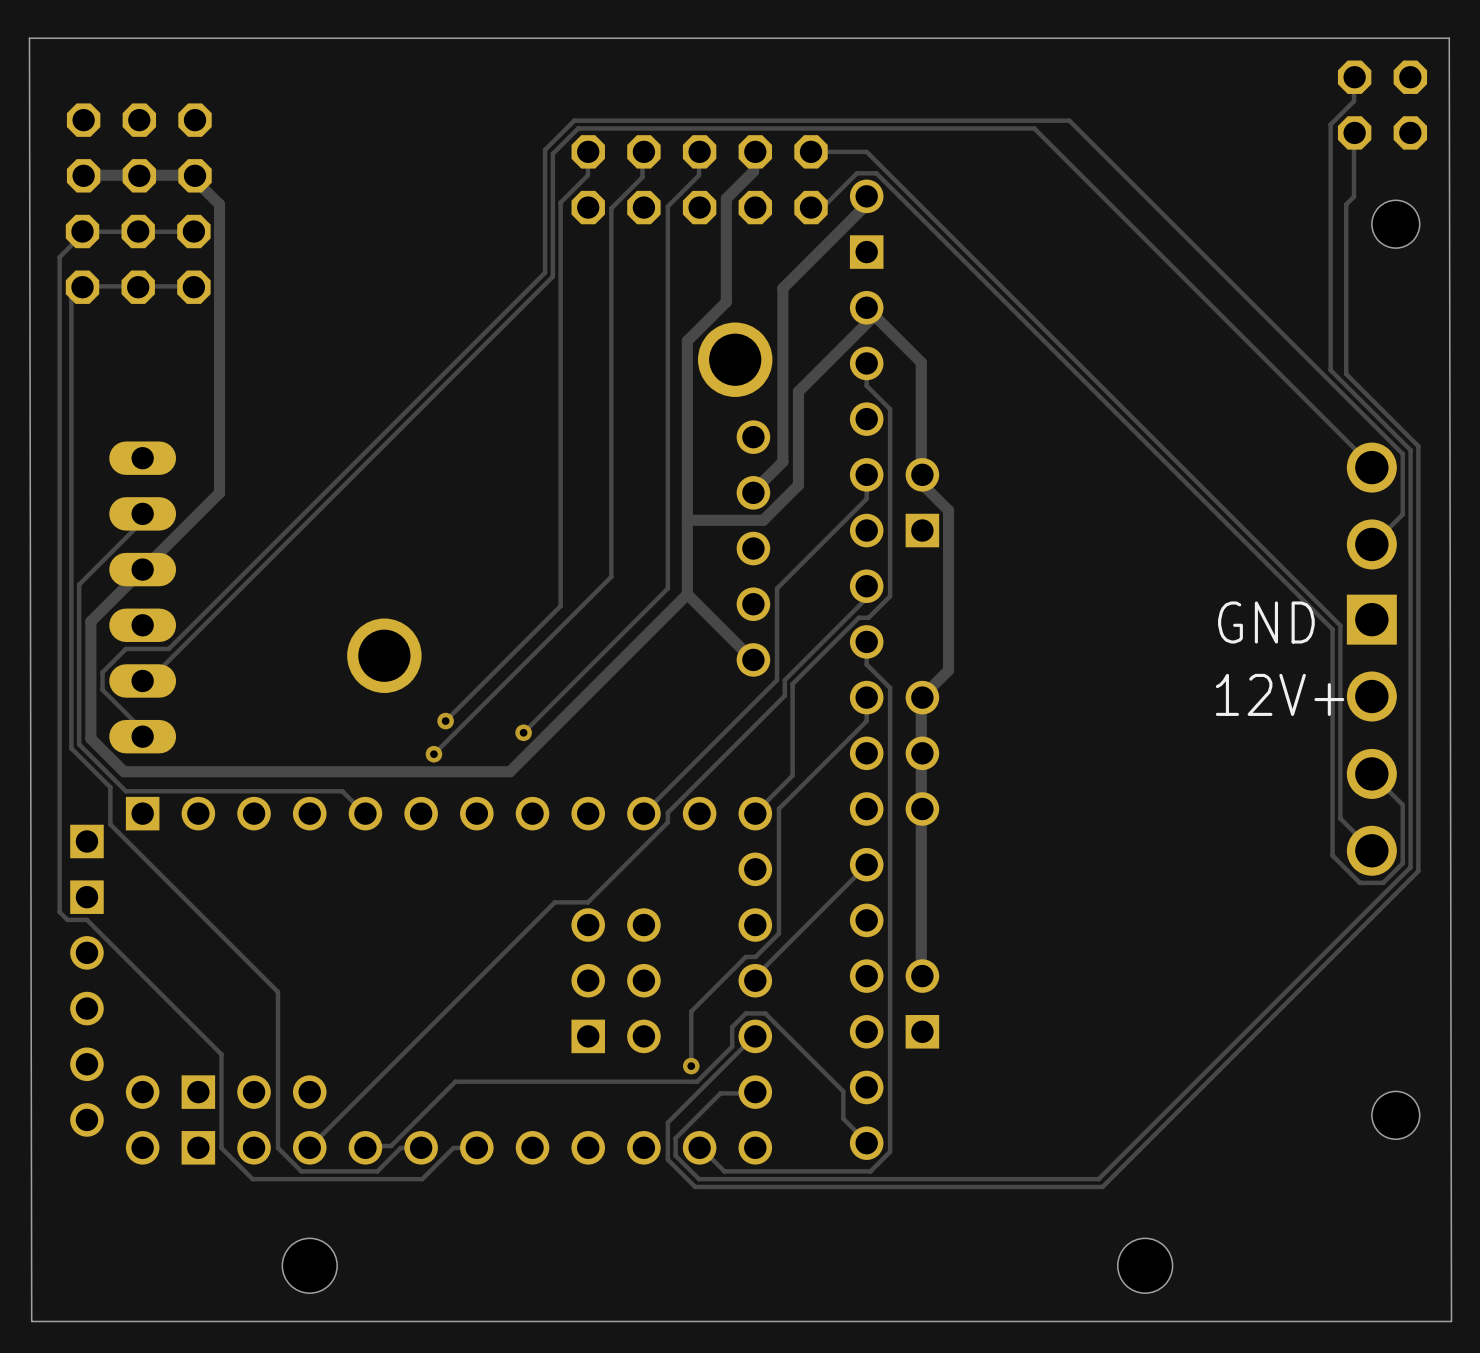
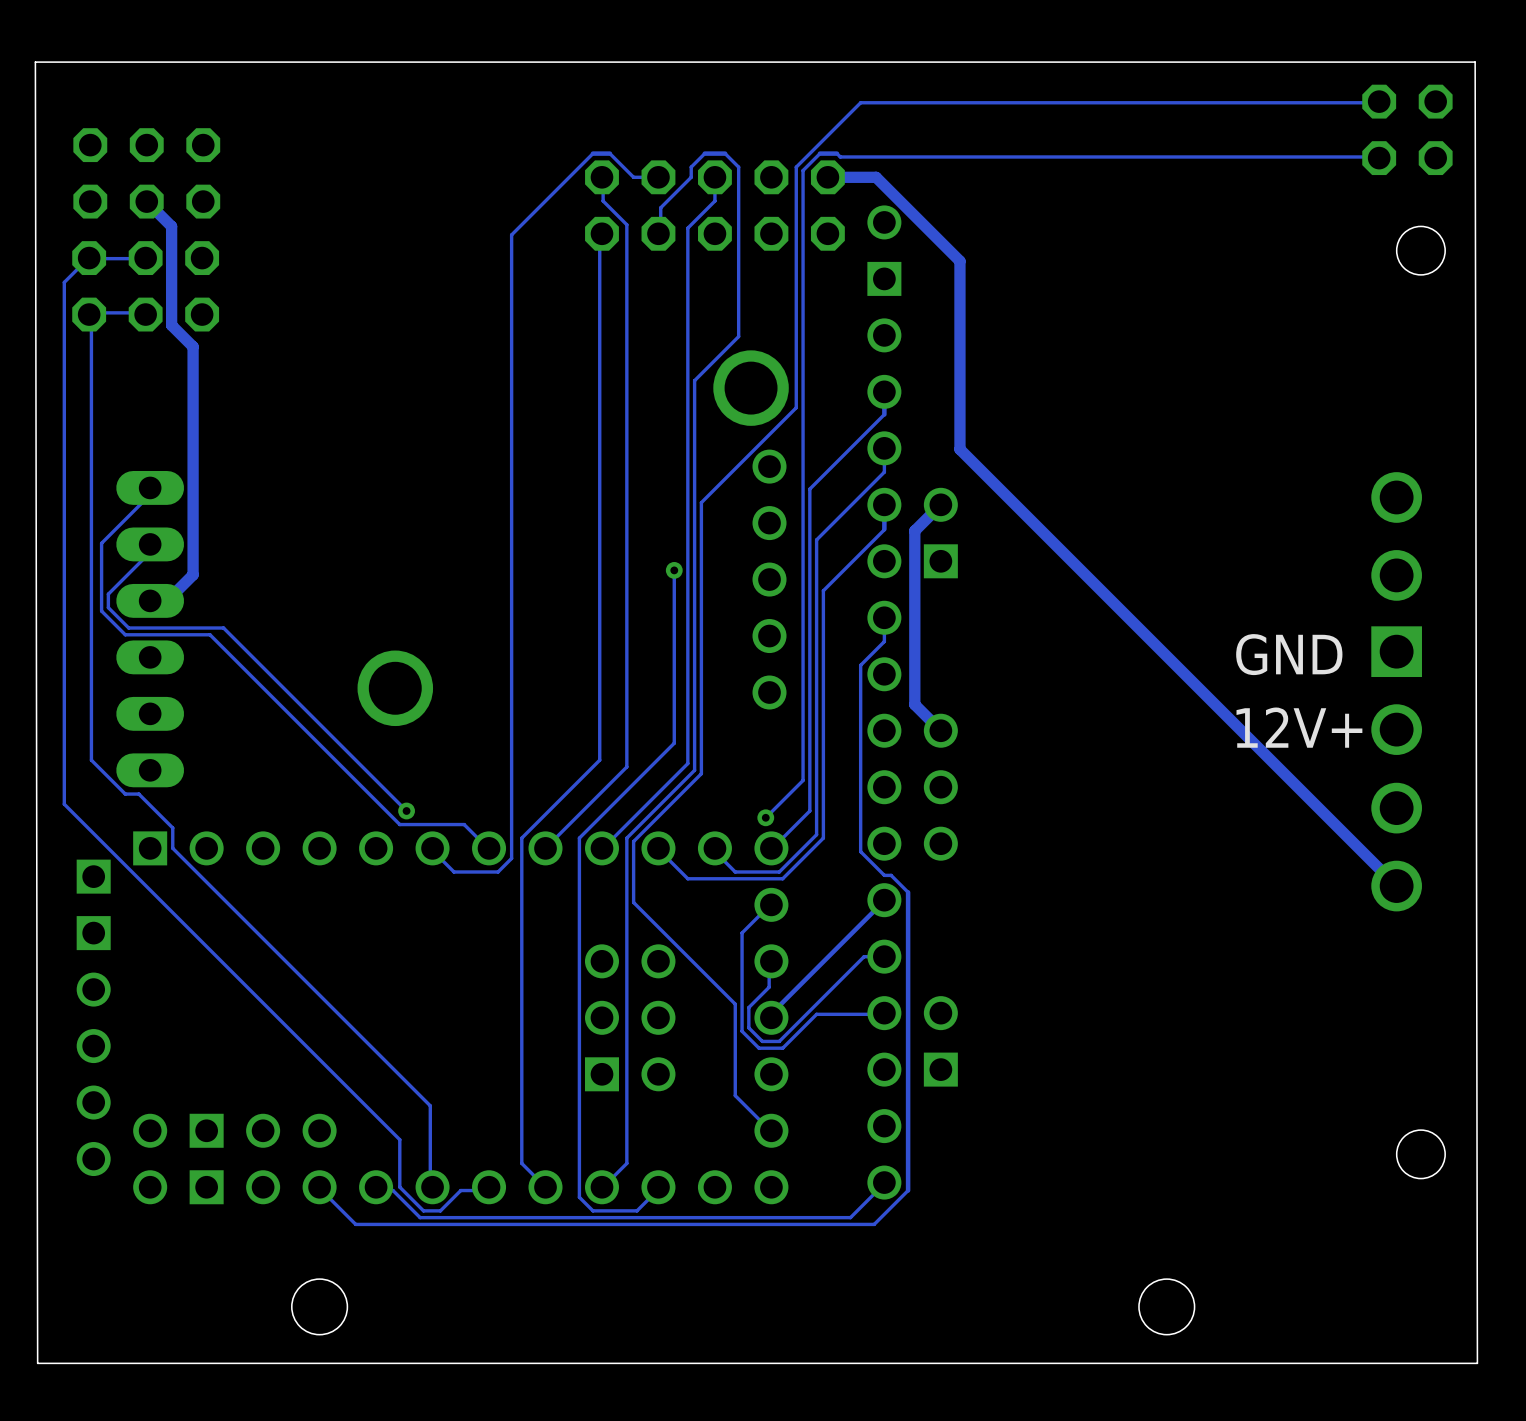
track: (1354, 77) (1354, 101) (1330, 124) (1330, 370) (1410, 450) (1410, 867) (1098, 1179) (699, 1179) (675, 1155) (675, 1138) (720, 1093) (755, 1092) -> (1379, 101) (860, 102) (796, 167) (796, 407) (701, 502) (701, 773) (633, 841) (633, 902) (735, 1004) (735, 1095) (771, 1130)
track: (579, 128) (552, 153) (552, 276) (149, 680) (142, 680) -> (592, 153) (511, 234) (511, 858) (498, 872) (454, 872) (432, 848)
track: (689, 128) (596, 128) -> (657, 177) (633, 177) (609, 153)
track: none -> (704, 153) (691, 167) (691, 177) (660, 207) (660, 231) (658, 233)
track: none -> (725, 153) (738, 167) (738, 336) (694, 380) (694, 770) (626, 838) (626, 1163) (601, 1187)
track: (803, 128) (709, 128) -> (819, 153) (803, 170) (803, 780) (765, 817)
track: (819, 128) (1034, 128) (1371, 467) -> (836, 153) (840, 156) (1379, 158)
track: (1354, 132) (1354, 196) (1346, 204) (1346, 374) (1418, 446) (1418, 871) (1102, 1186) (695, 1186) (667, 1159) (667, 1122) (755, 1036) -> none
track: (587, 151) (587, 175) (560, 202) (560, 606) (445, 721) -> (601, 177) (603, 201) (626, 224) (626, 766) (545, 848)
track: (642, 151) (642, 177) (611, 208) (611, 576) (433, 754) -> none
track: (699, 151) (699, 175) (667, 206) (667, 588) (523, 732) -> (714, 177) (714, 201) (687, 228) (687, 763) (601, 848)
track: (755, 151) (753, 151) (753, 171) (726, 198) (726, 301) (687, 340) (687, 594) -> none
track: (858, 151) (866, 151) (1340, 625) (1340, 818) (1371, 850) -> (876, 177) (959, 261) (959, 449) (1396, 886)
track width: thin (858, 151) (811, 151) -> thick (876, 177) (827, 177)
track: (83, 175) (194, 175) (196, 181) (219, 204) (219, 493) (90, 621) (90, 738) (124, 771) (509, 771) (687, 594) -> none
track: none -> (146, 201) (171, 226) (171, 325) (193, 346) (193, 574) (167, 600) (150, 600)
track: (866, 196) (866, 204) (782, 288) (782, 461) (753, 492) -> none
track: none -> (601, 233) (599, 234) (599, 760) (521, 838) (521, 1163) (545, 1187)
track: (811, 207) (823, 206) (856, 173) (876, 173) (1332, 629) (1332, 855) (1359, 882) (1383, 882) (1402, 863) (1402, 804) (1371, 773) -> none
track: (193, 231) (82, 231) (83, 233) (59, 257) (59, 912) (67, 919) (86, 919) (221, 1054) (221, 1147) (252, 1179) (422, 1179) (453, 1147) (476, 1147) -> (145, 258) (89, 258) (64, 282) (64, 804) (399, 1139) (399, 1187) (423, 1210) (440, 1210) (460, 1190) (487, 1190) (489, 1187)
track: (193, 287) (83, 286) (71, 298) (71, 748) (110, 787) (110, 824) (278, 992) (278, 1147) (301, 1171) (377, 1171) (400, 1147) (421, 1147) -> (145, 314) (145, 312) (91, 312) (89, 314) (91, 316) (91, 760) (125, 794) (138, 794) (172, 827) (172, 848) (430, 1105) (430, 1187) (432, 1187)
track: (866, 385) (890, 409) (890, 596) (868, 617) (858, 617) (792, 684) (792, 775) (755, 813) -> (884, 414) (809, 489) (809, 811) (771, 848)
track: none -> (884, 448) (884, 472) (816, 539) (816, 834) (779, 872) (735, 872) (714, 851) (714, 848)
track: none -> (150, 487) (149, 495) (101, 543) (101, 611) (125, 634) (210, 634) (399, 824) (464, 824) (489, 848)
track: none -> (940, 504) (914, 530) (914, 704) (940, 730)
track: (866, 498) (777, 588) (777, 680) (643, 813) -> (884, 529) (823, 590) (823, 838) (782, 878) (687, 878) (658, 848)
track: (687, 520) (763, 520) (798, 485) (798, 391) (870, 319) (866, 307) (921, 362) (921, 473) (925, 479) (925, 487) (948, 510) (948, 670) (921, 697) (922, 976) -> none
track: (141, 522) (79, 584) (79, 744) (125, 791) (342, 791) (365, 813) -> (149, 552) (108, 594) (108, 607) (128, 628) (223, 628) (406, 811)
track: none -> (674, 570) (674, 743) (579, 838) (579, 1197) (592, 1210) (637, 1210) (658, 1187)
via: none -> (674, 570)
track: (1371, 544) (1402, 514) (1402, 454) (1069, 120) (574, 120) (545, 149) (545, 272) (168, 648) (125, 648) (102, 672) (102, 689) (141, 728) (142, 736) -> none
track: (687, 594) (753, 659) -> none
track: (866, 598) (784, 680) (784, 695) (667, 812) (667, 822) (587, 902) (554, 902) (309, 1147) -> none
track: (866, 641) (866, 664) (890, 687) (890, 856) -> (884, 629) (884, 641) (860, 665) (860, 851) (884, 875) (891, 875) (908, 892)
track: (866, 697) (866, 721) (778, 808) (778, 933) (755, 956) (745, 956) (691, 1011) (691, 1066) -> none
via: (445, 721) -> none
via: (523, 732) -> none
via: (433, 754) -> none
via: none -> (406, 811)
via: none -> (765, 817)
track: none -> (771, 904) (742, 932) (742, 1031) (759, 1048) (782, 1048) (816, 1014) (884, 1013)
track: none -> (884, 956) (864, 956) (779, 1041) (762, 1041) (748, 1027) (748, 1007) (769, 987) (769, 963) (771, 961)
via: (691, 1066) -> none
track: (866, 1143) (843, 1118) (843, 1091) (765, 1013) (745, 1013) (732, 1027) (732, 1046) (697, 1081) (455, 1081) (391, 1146) (365, 1146) (365, 1147) -> (884, 1182) (850, 1217) (420, 1217) (393, 1190) (376, 1190) (376, 1187)
track: (699, 1147) (724, 1171) (870, 1171) (890, 1151) -> (319, 1187) (355, 1224) (874, 1224) (908, 1190)

